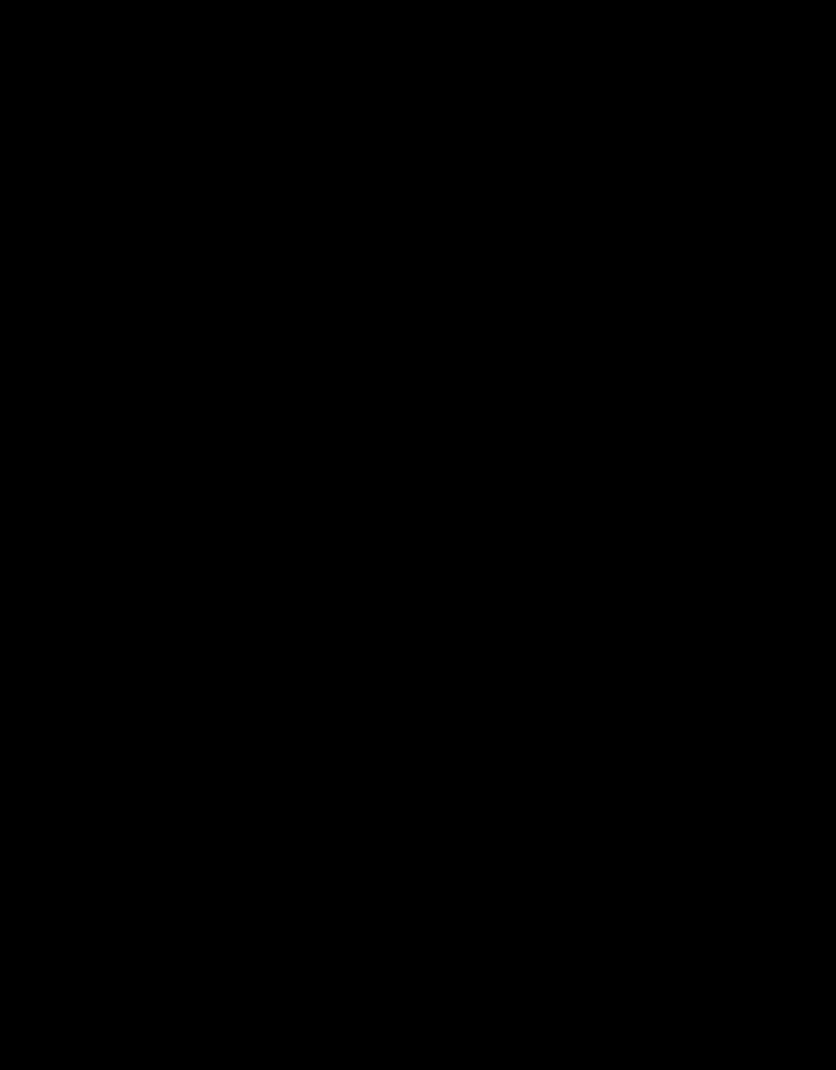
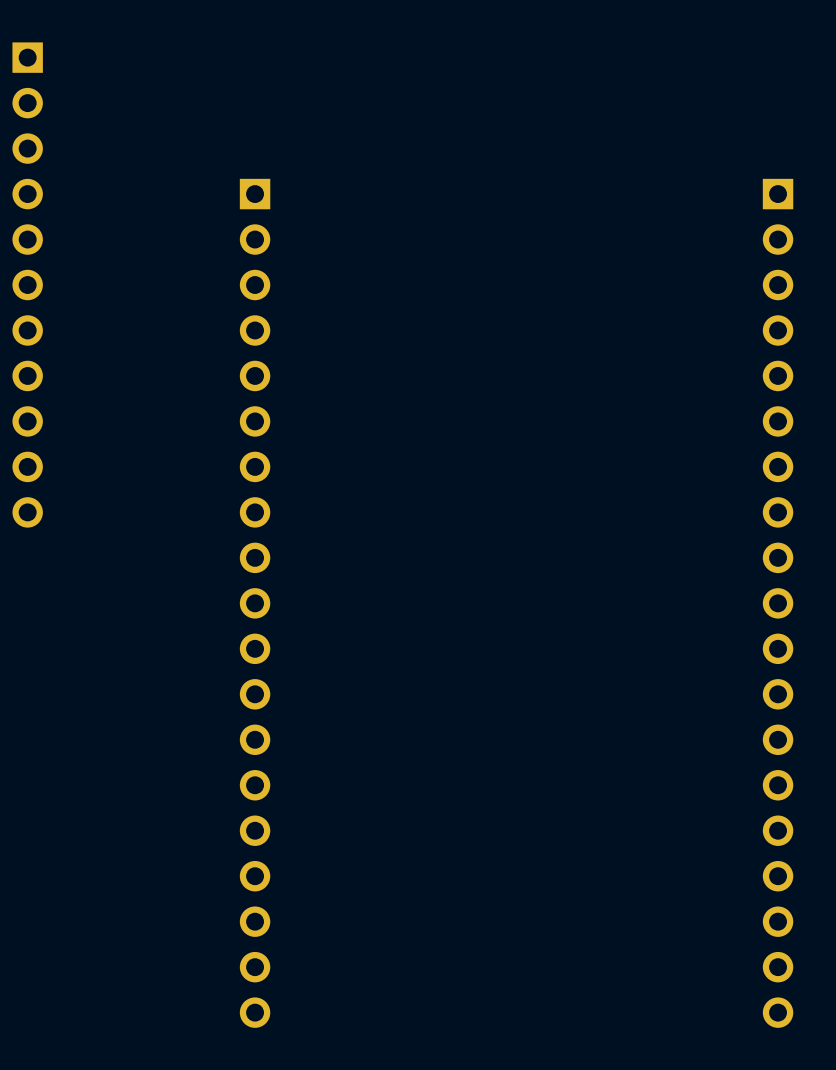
part: none -> (27, 285)
part: none -> (255, 603)
part: none -> (778, 603)

